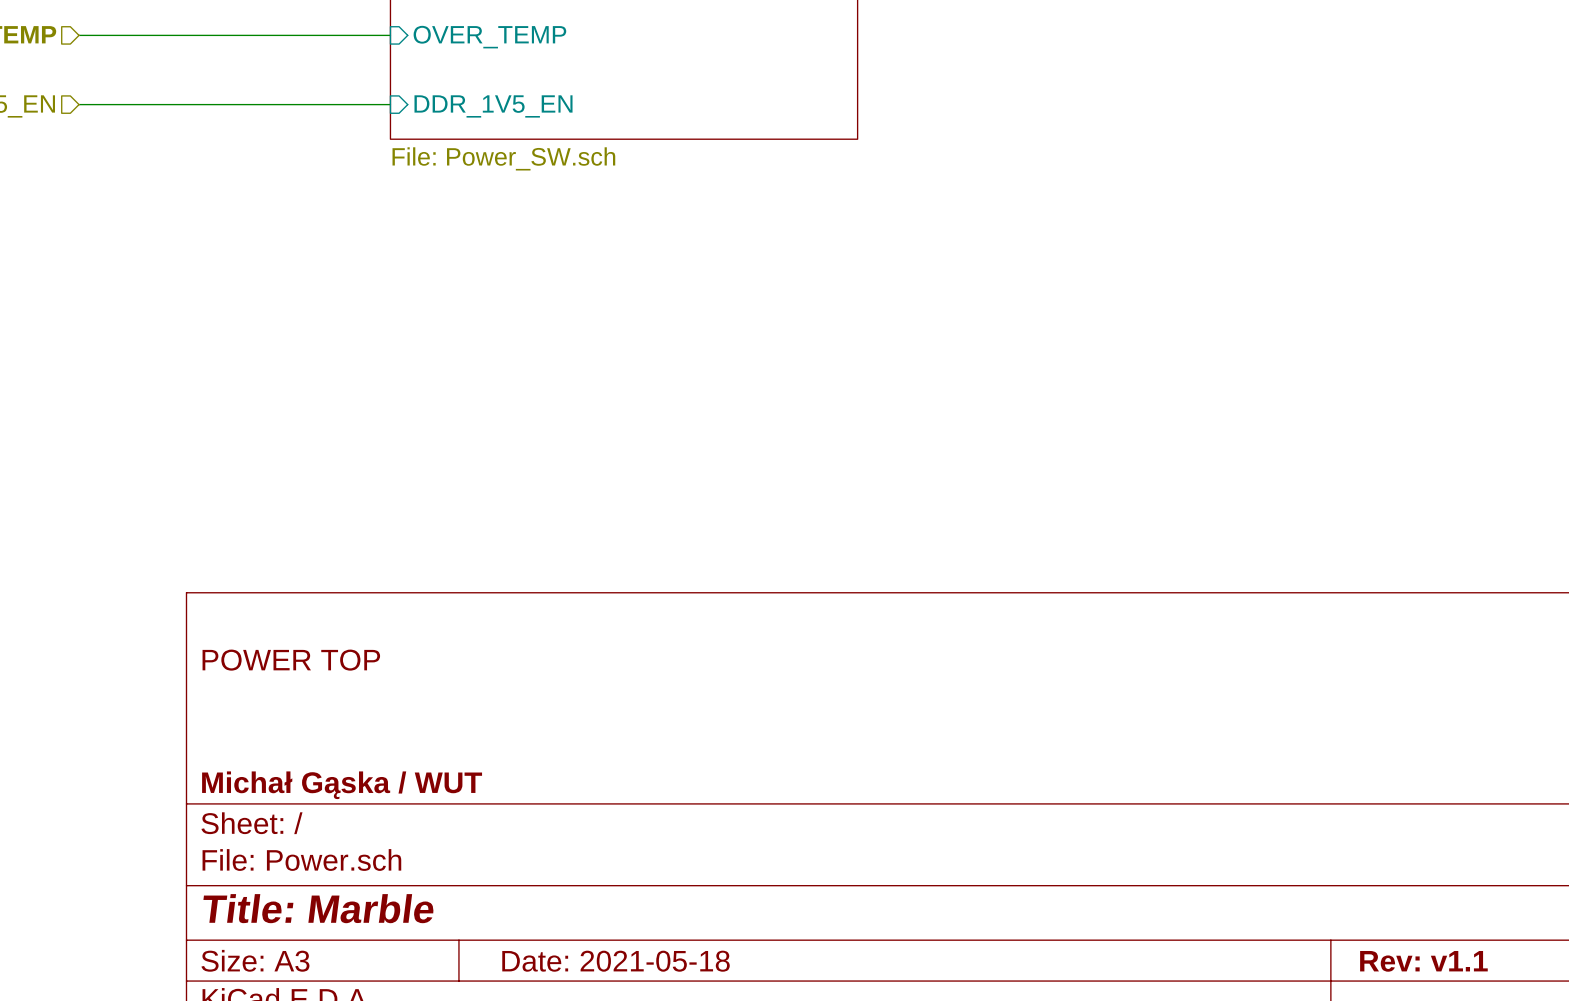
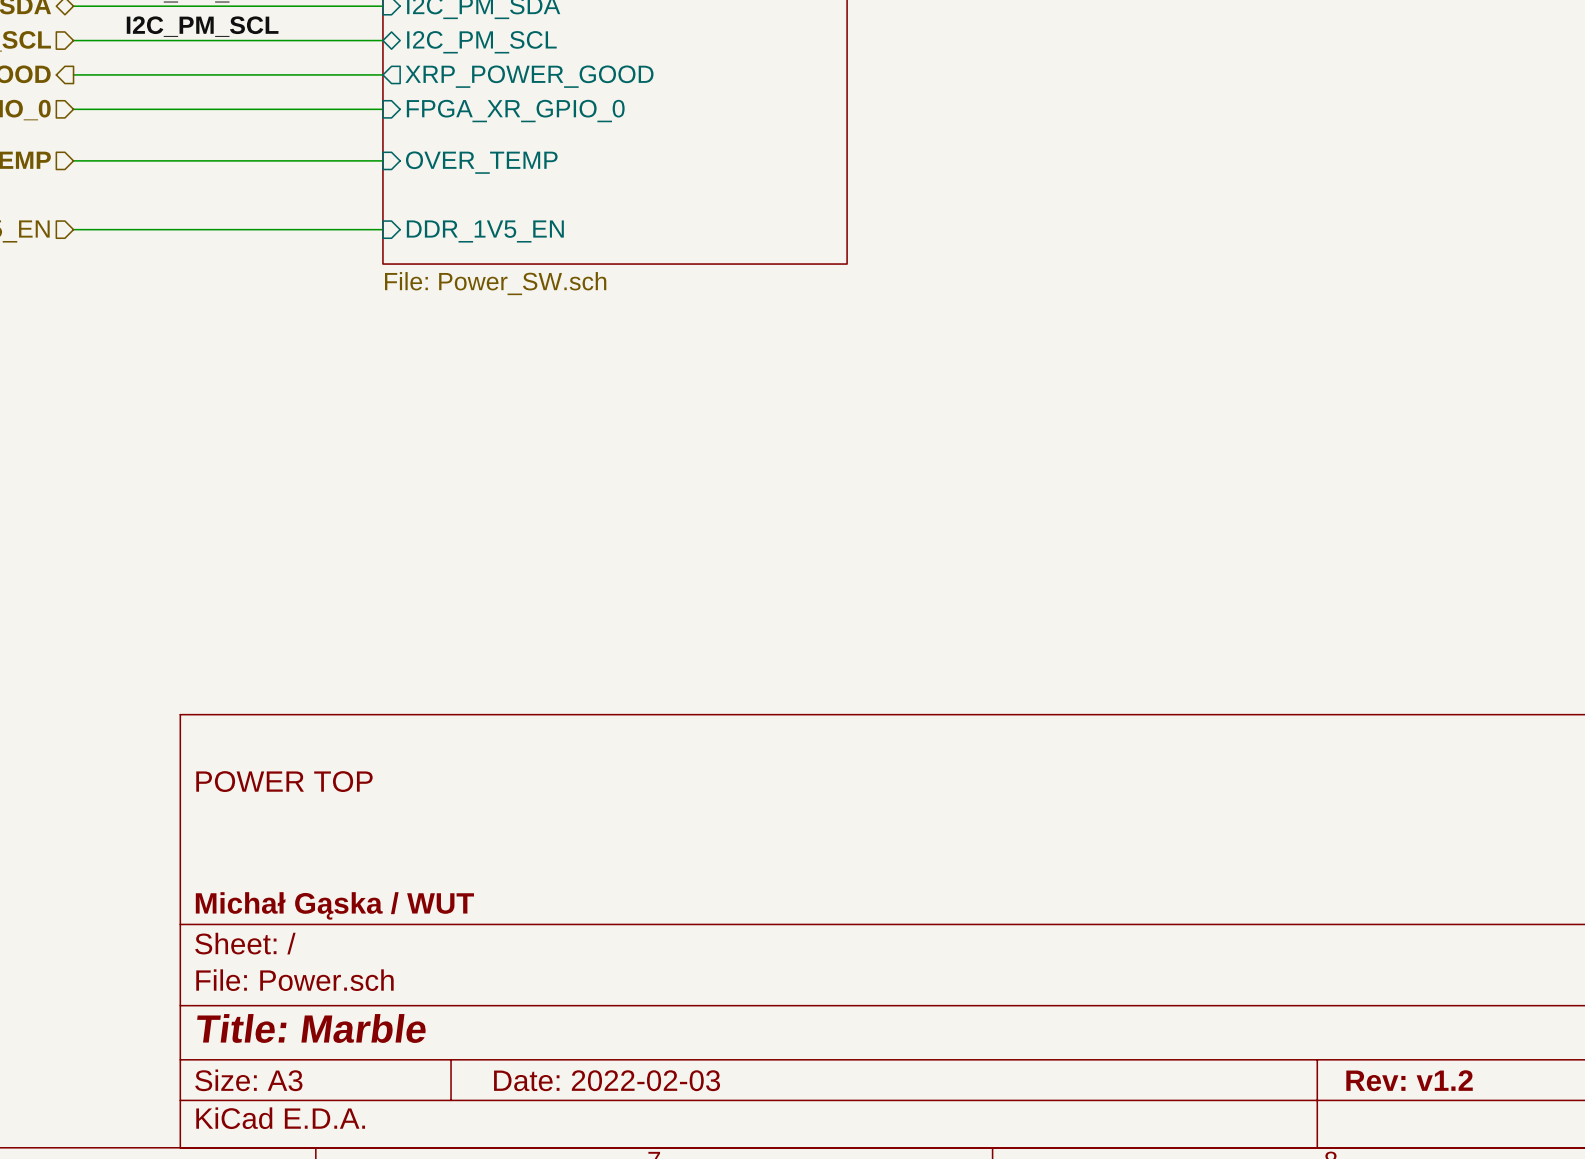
title block: Date: 2021-05-18 (616, 961) -> Date: 2022-02-03 (607, 1080)
title block: Rev: v1.1 (1423, 961) -> Rev: v1.2 (1409, 1080)

